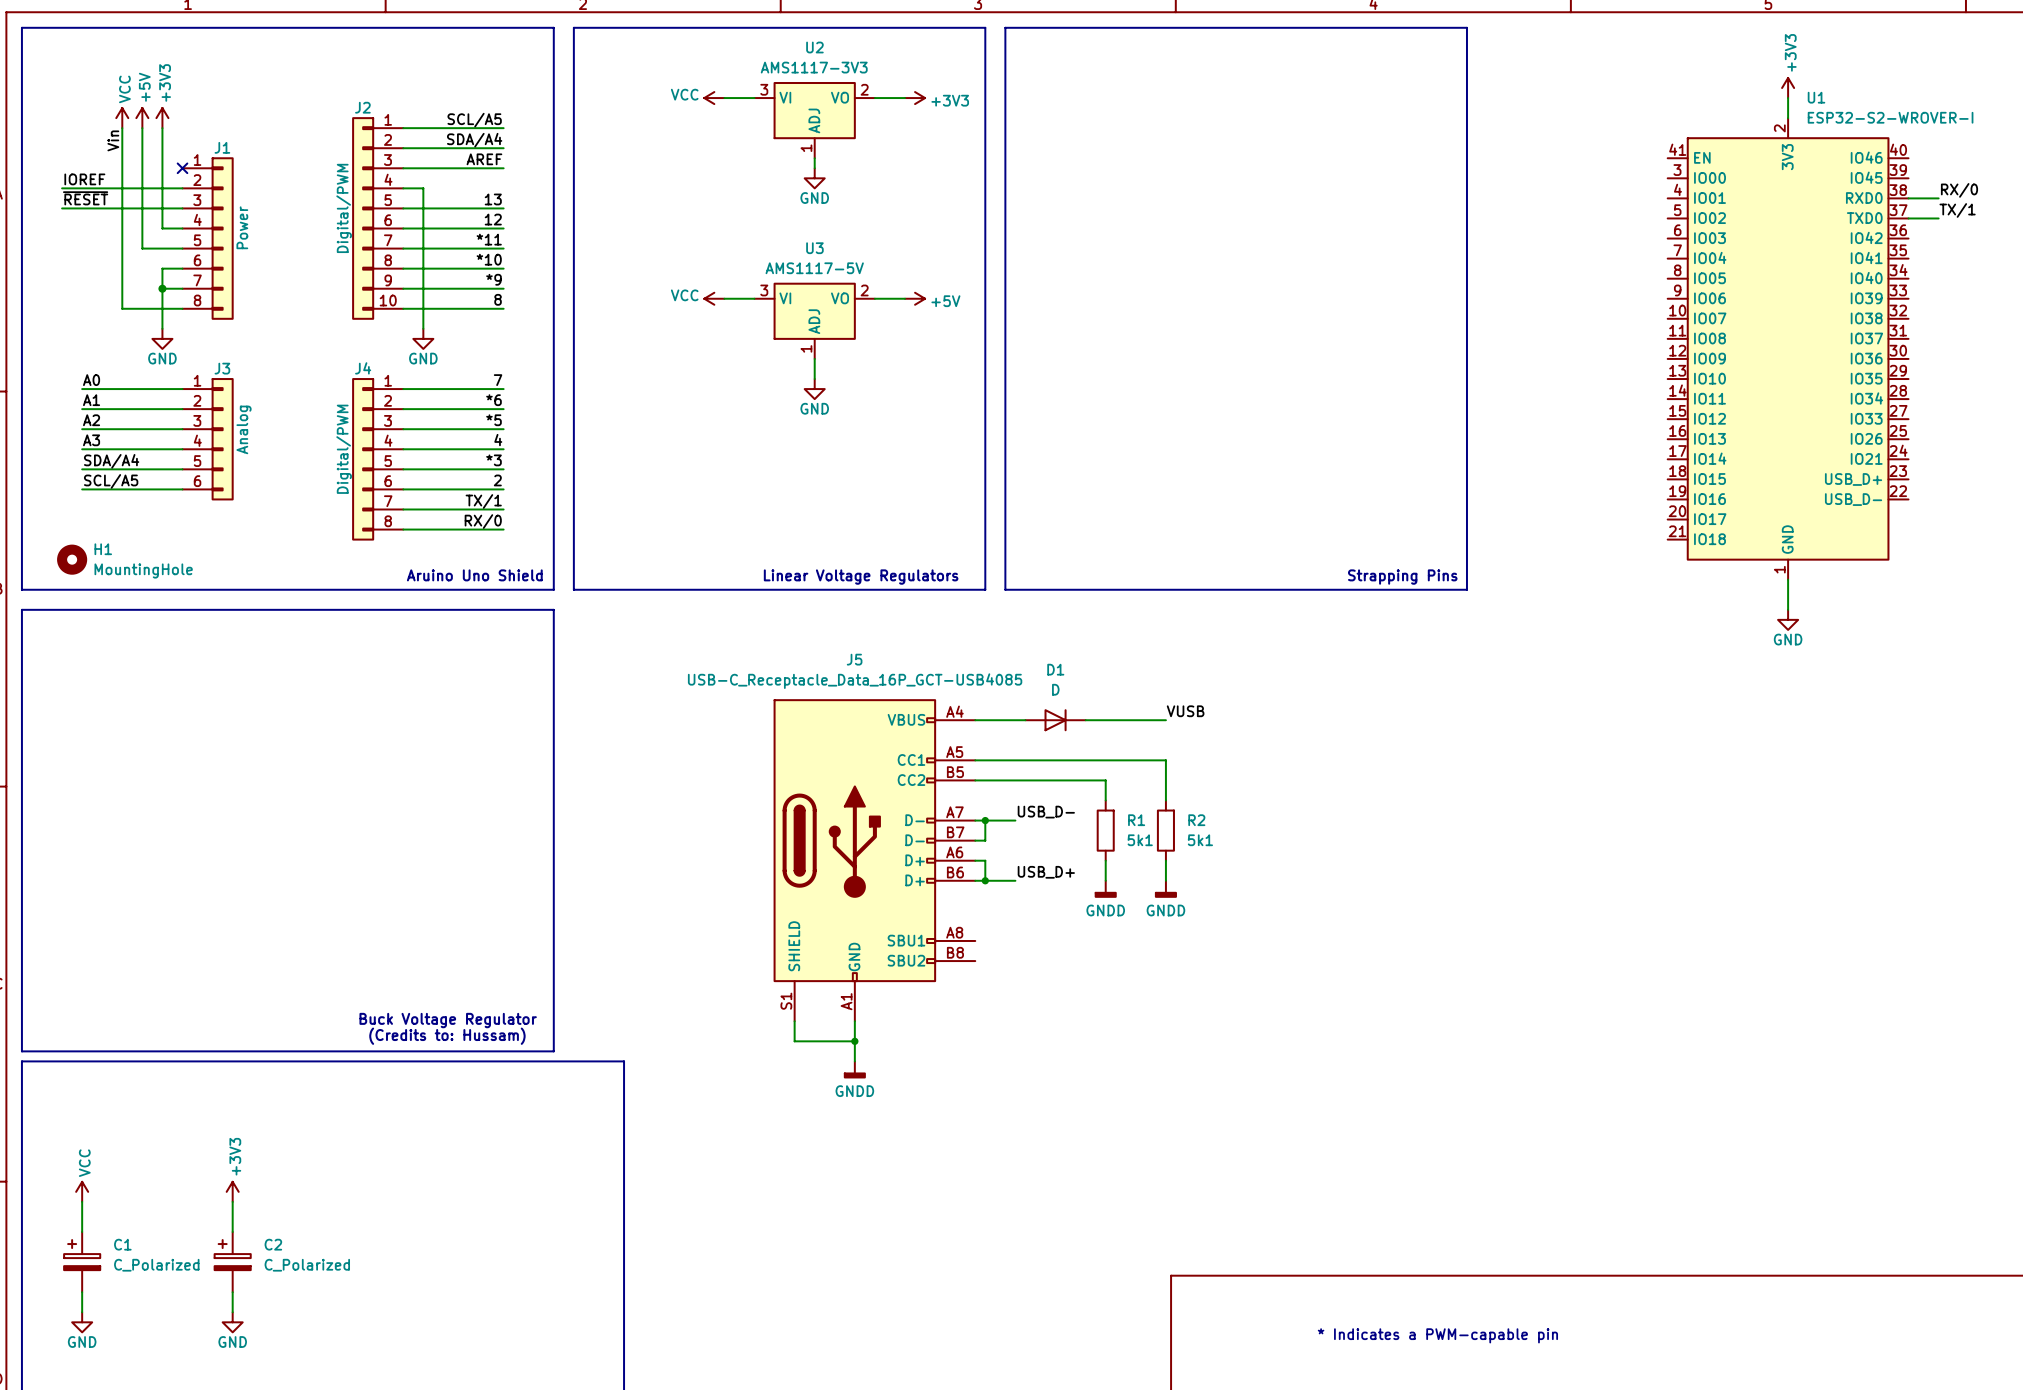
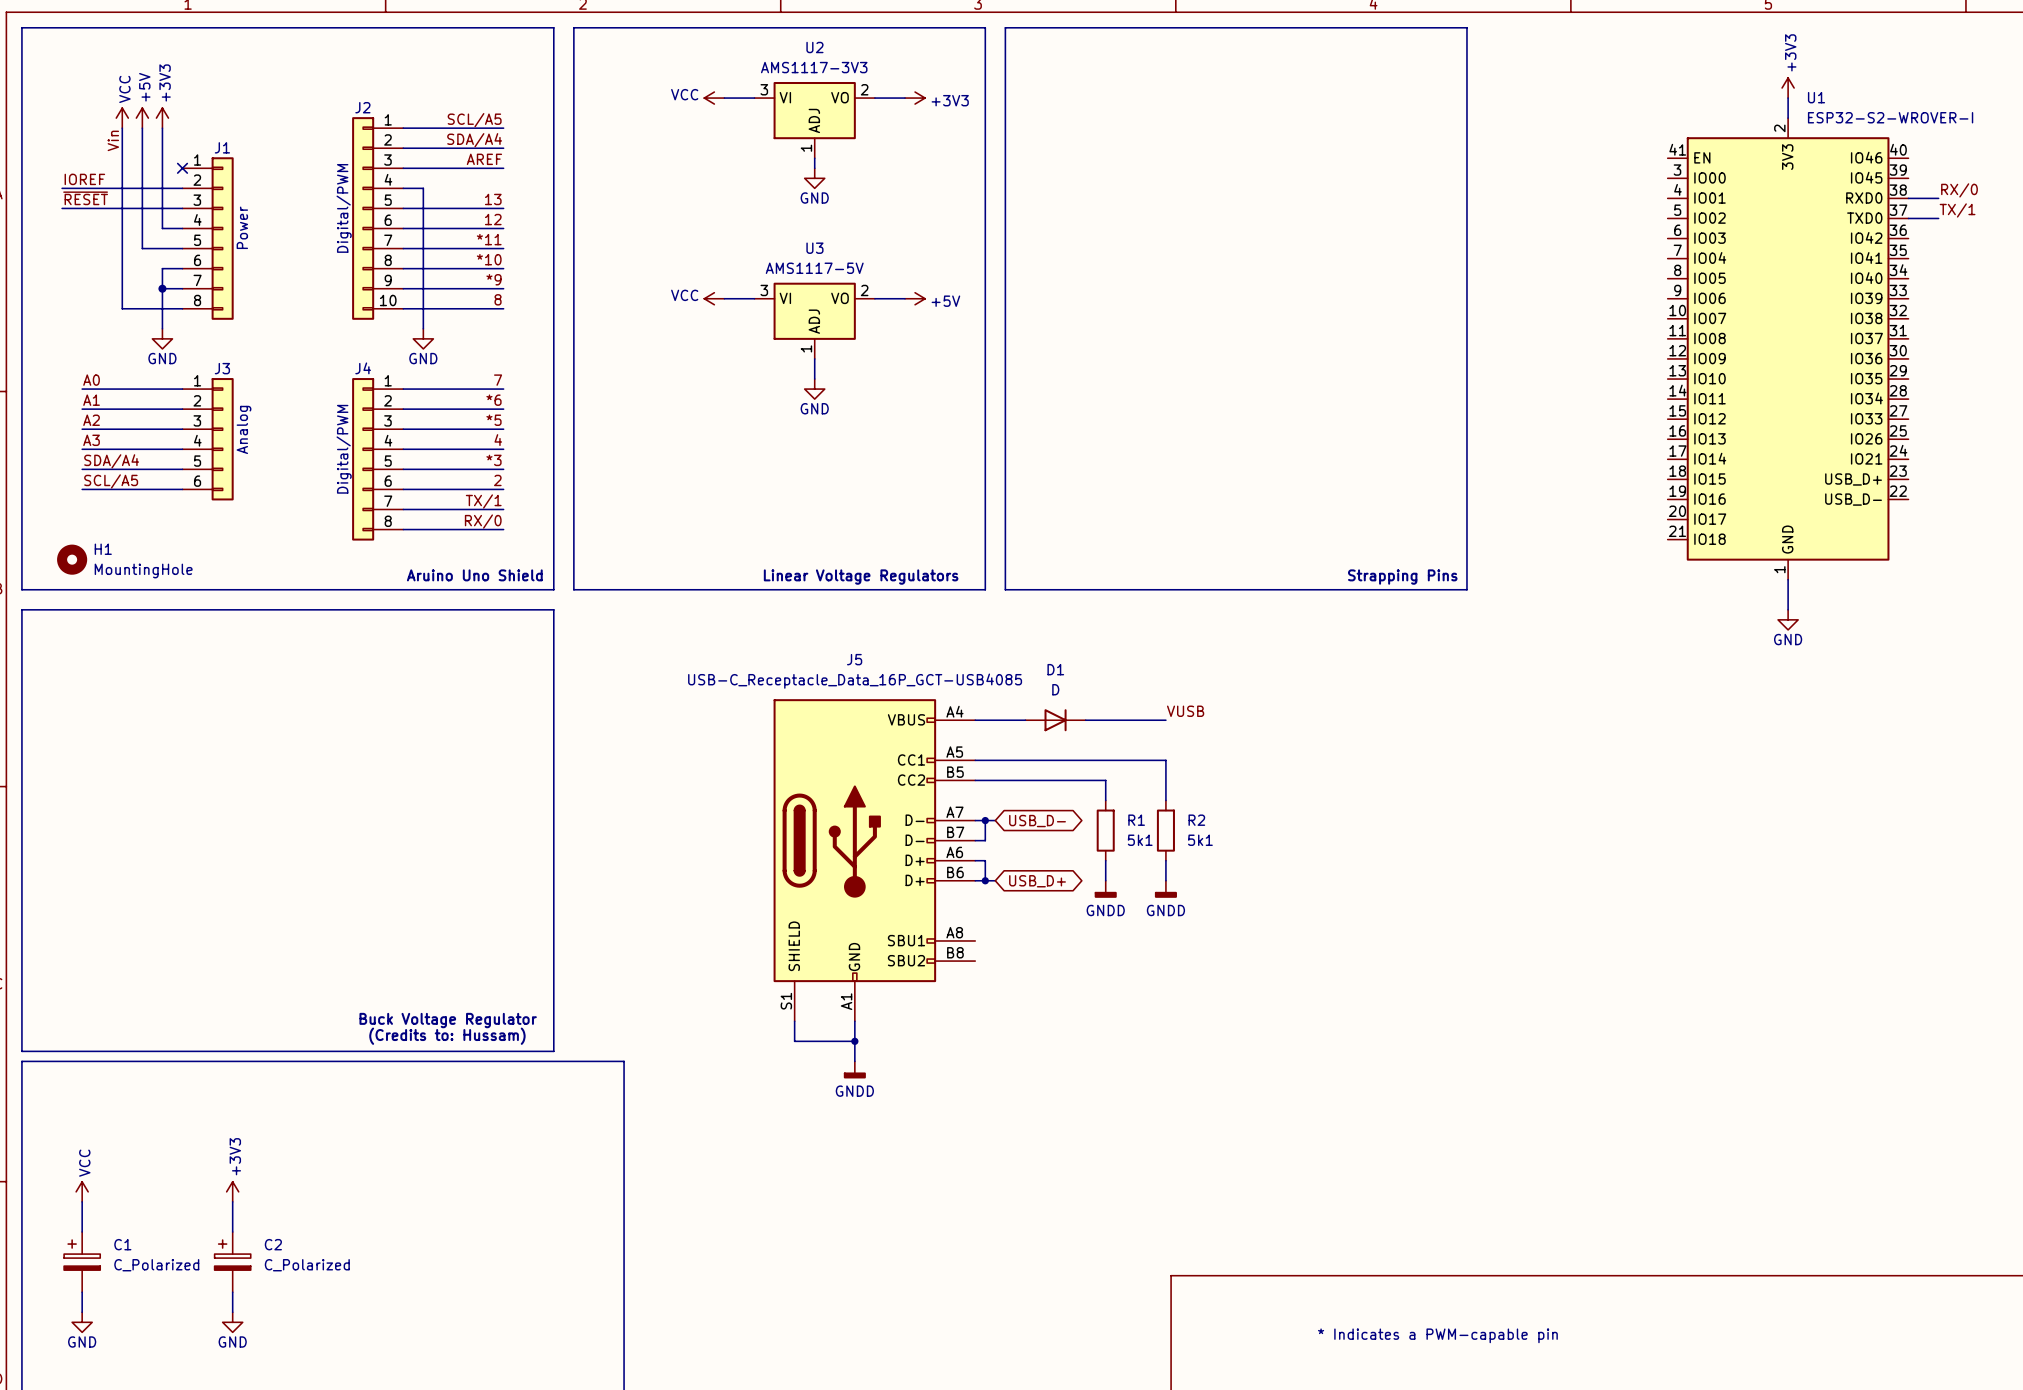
label: USB_D- (1046, 812) -> none
wire: (995, 820) (1015, 820) -> none
global label: none -> USB_D- (1037, 821)
label: USB_D+ (1046, 872) -> none
wire: (995, 880) (1015, 880) -> none
global label: none -> USB_D+ (1037, 881)

